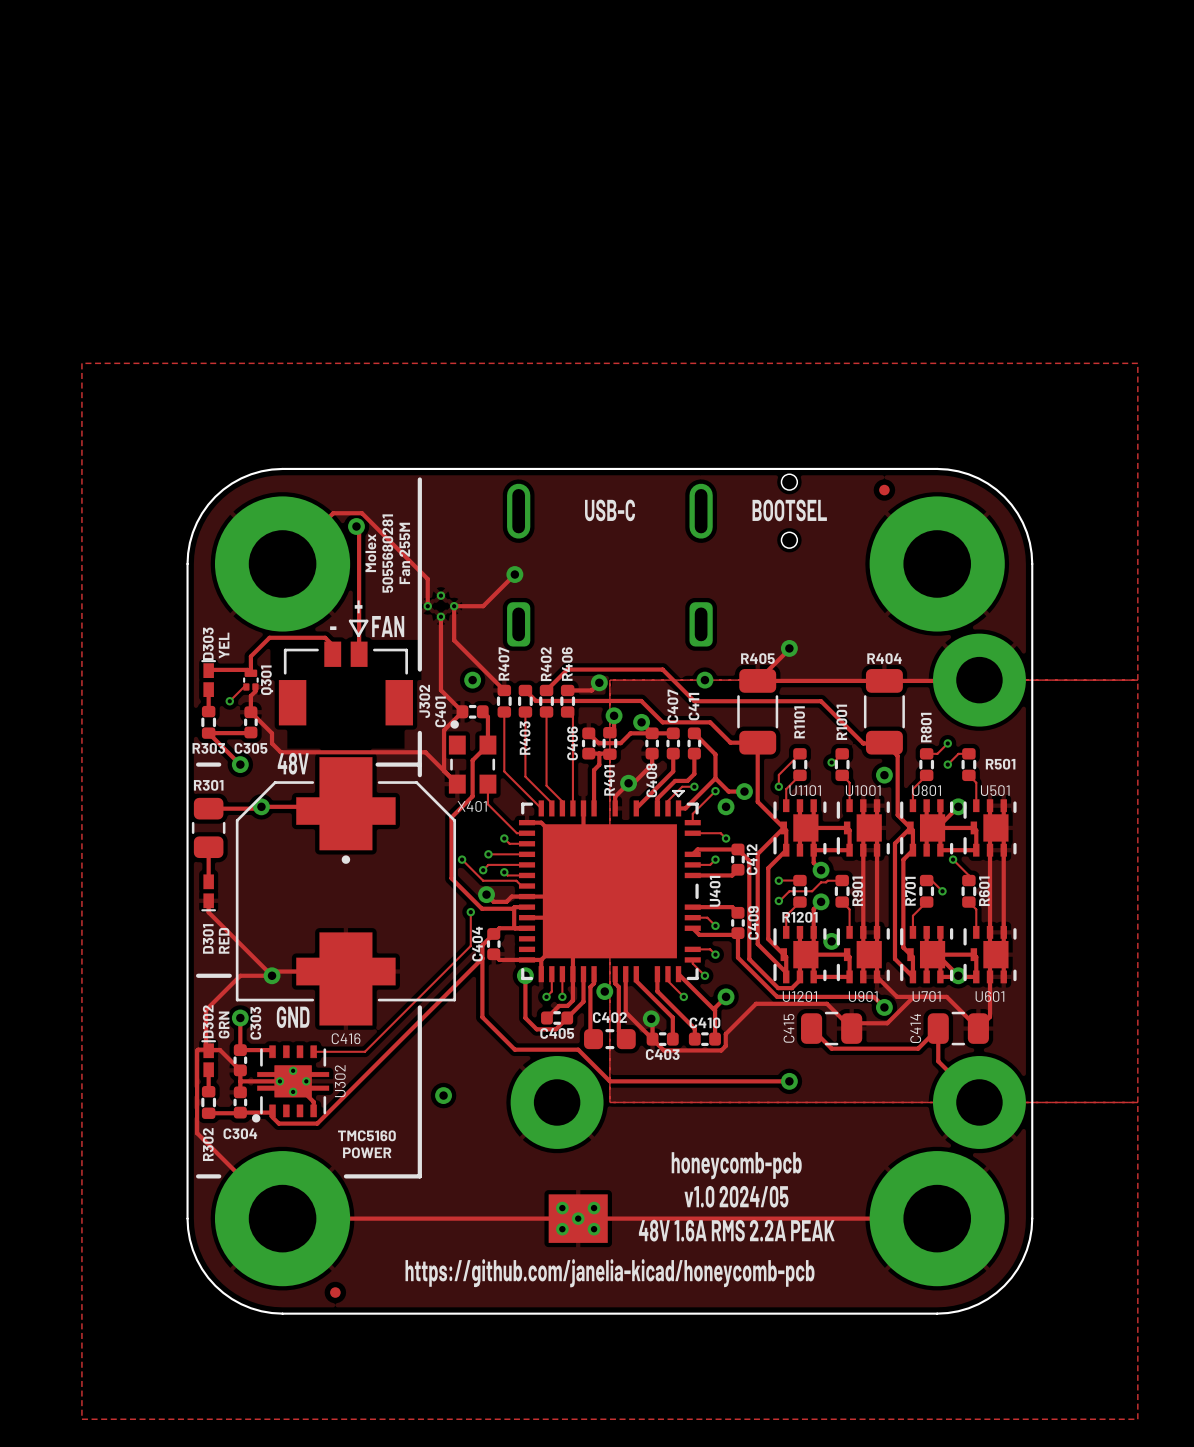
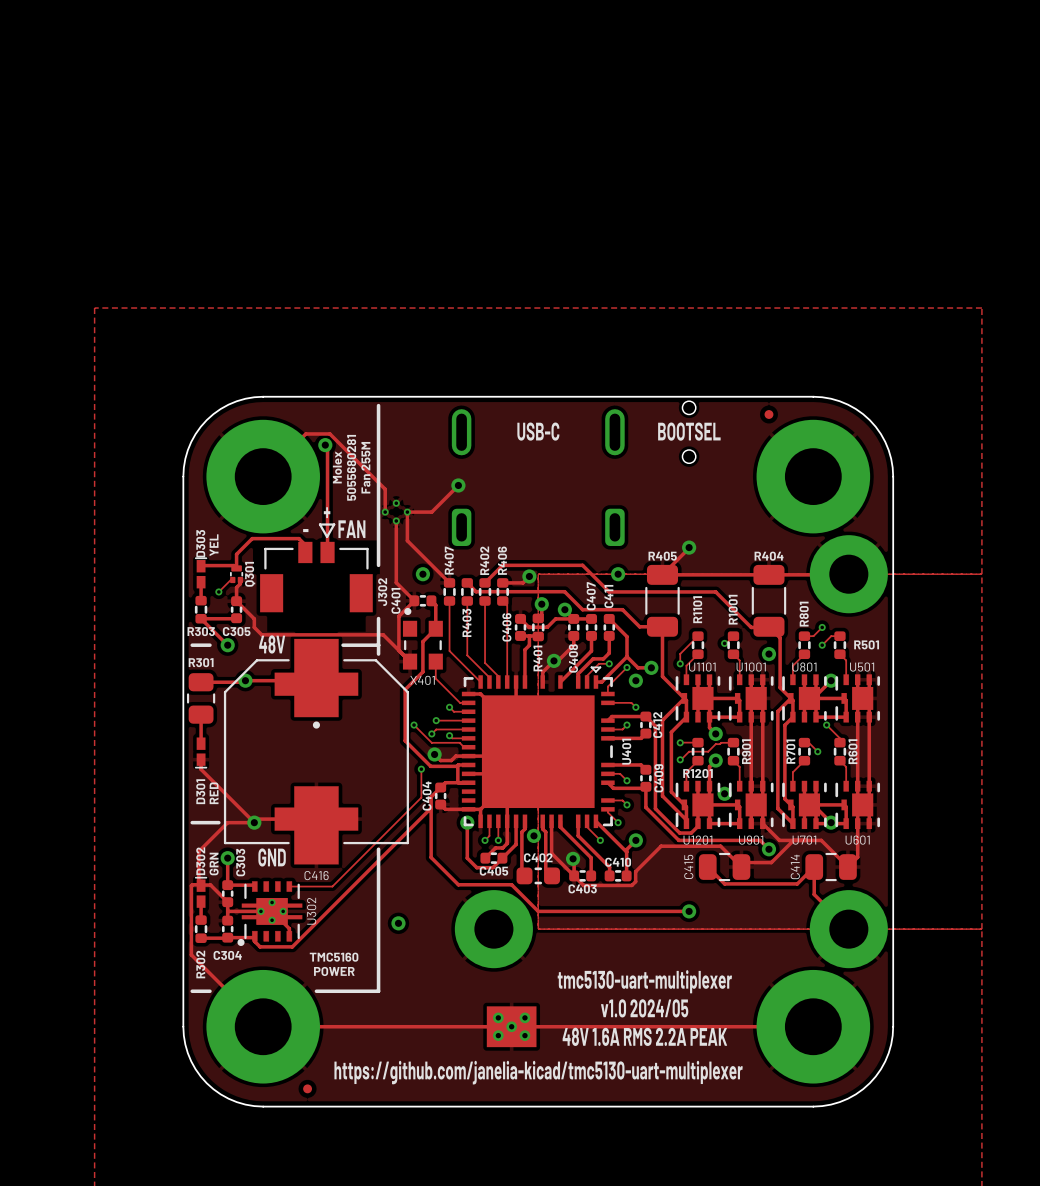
text: honeycomb-pcb (736, 1165) -> tmc5130-uart-multiplexer (644, 981)
text: https://github.com/janelia-kicad/honeycomb-pcb (610, 1273) -> https://github.com/janelia-kicad/tmc5130-uart-multiplexer (538, 1072)

